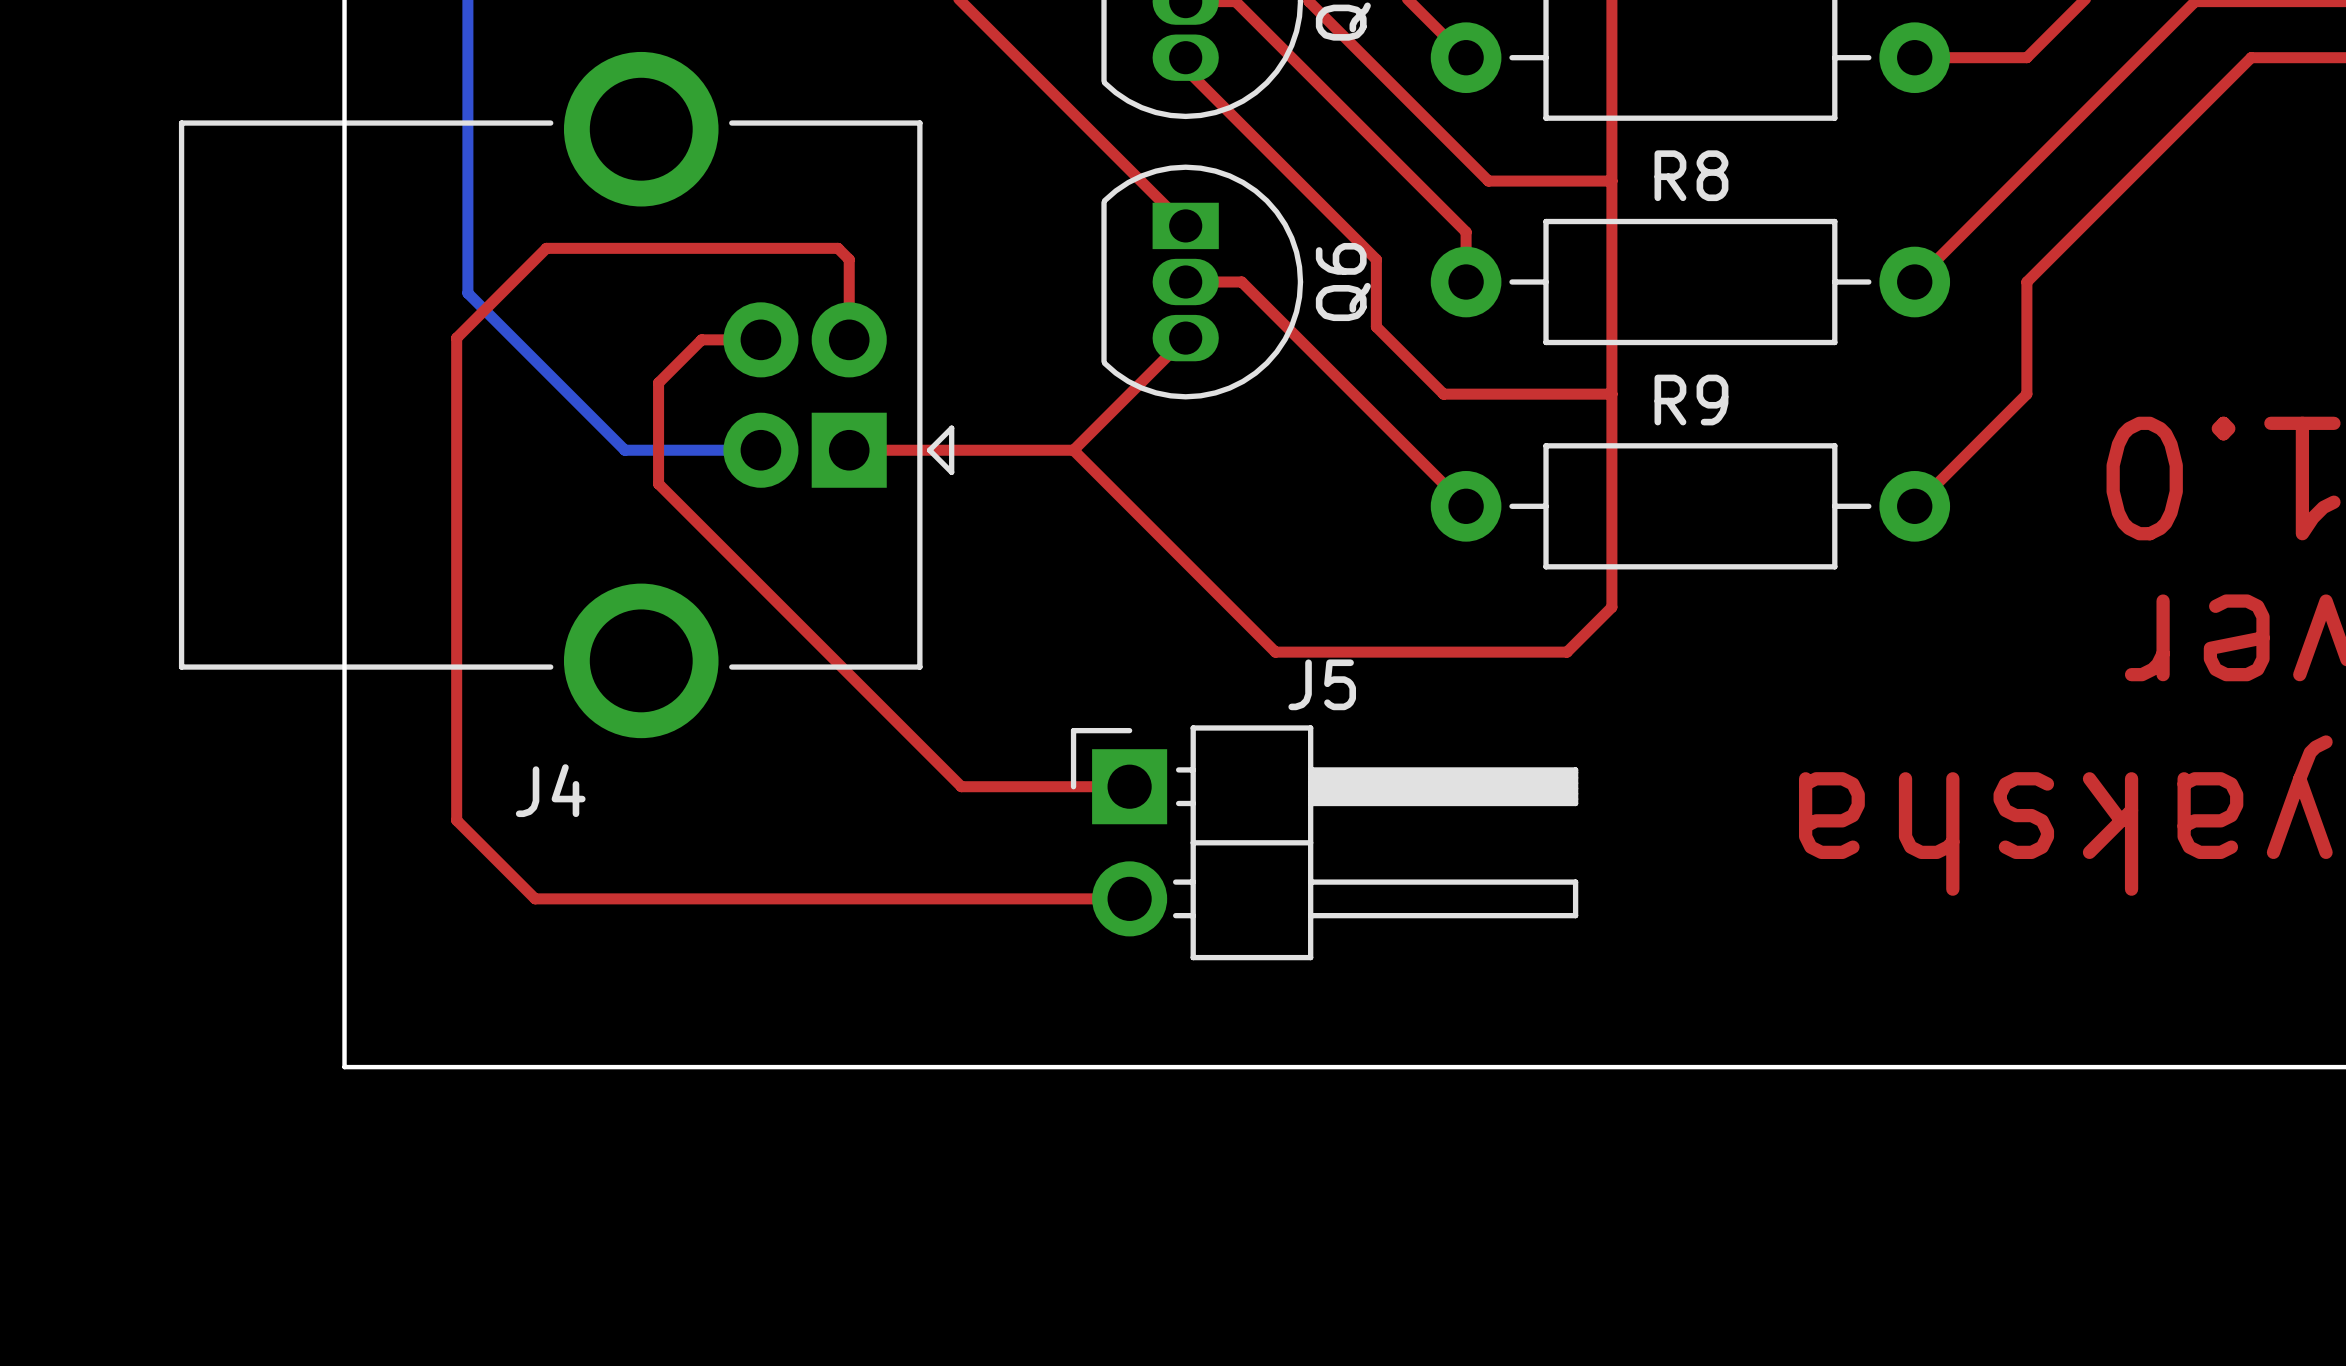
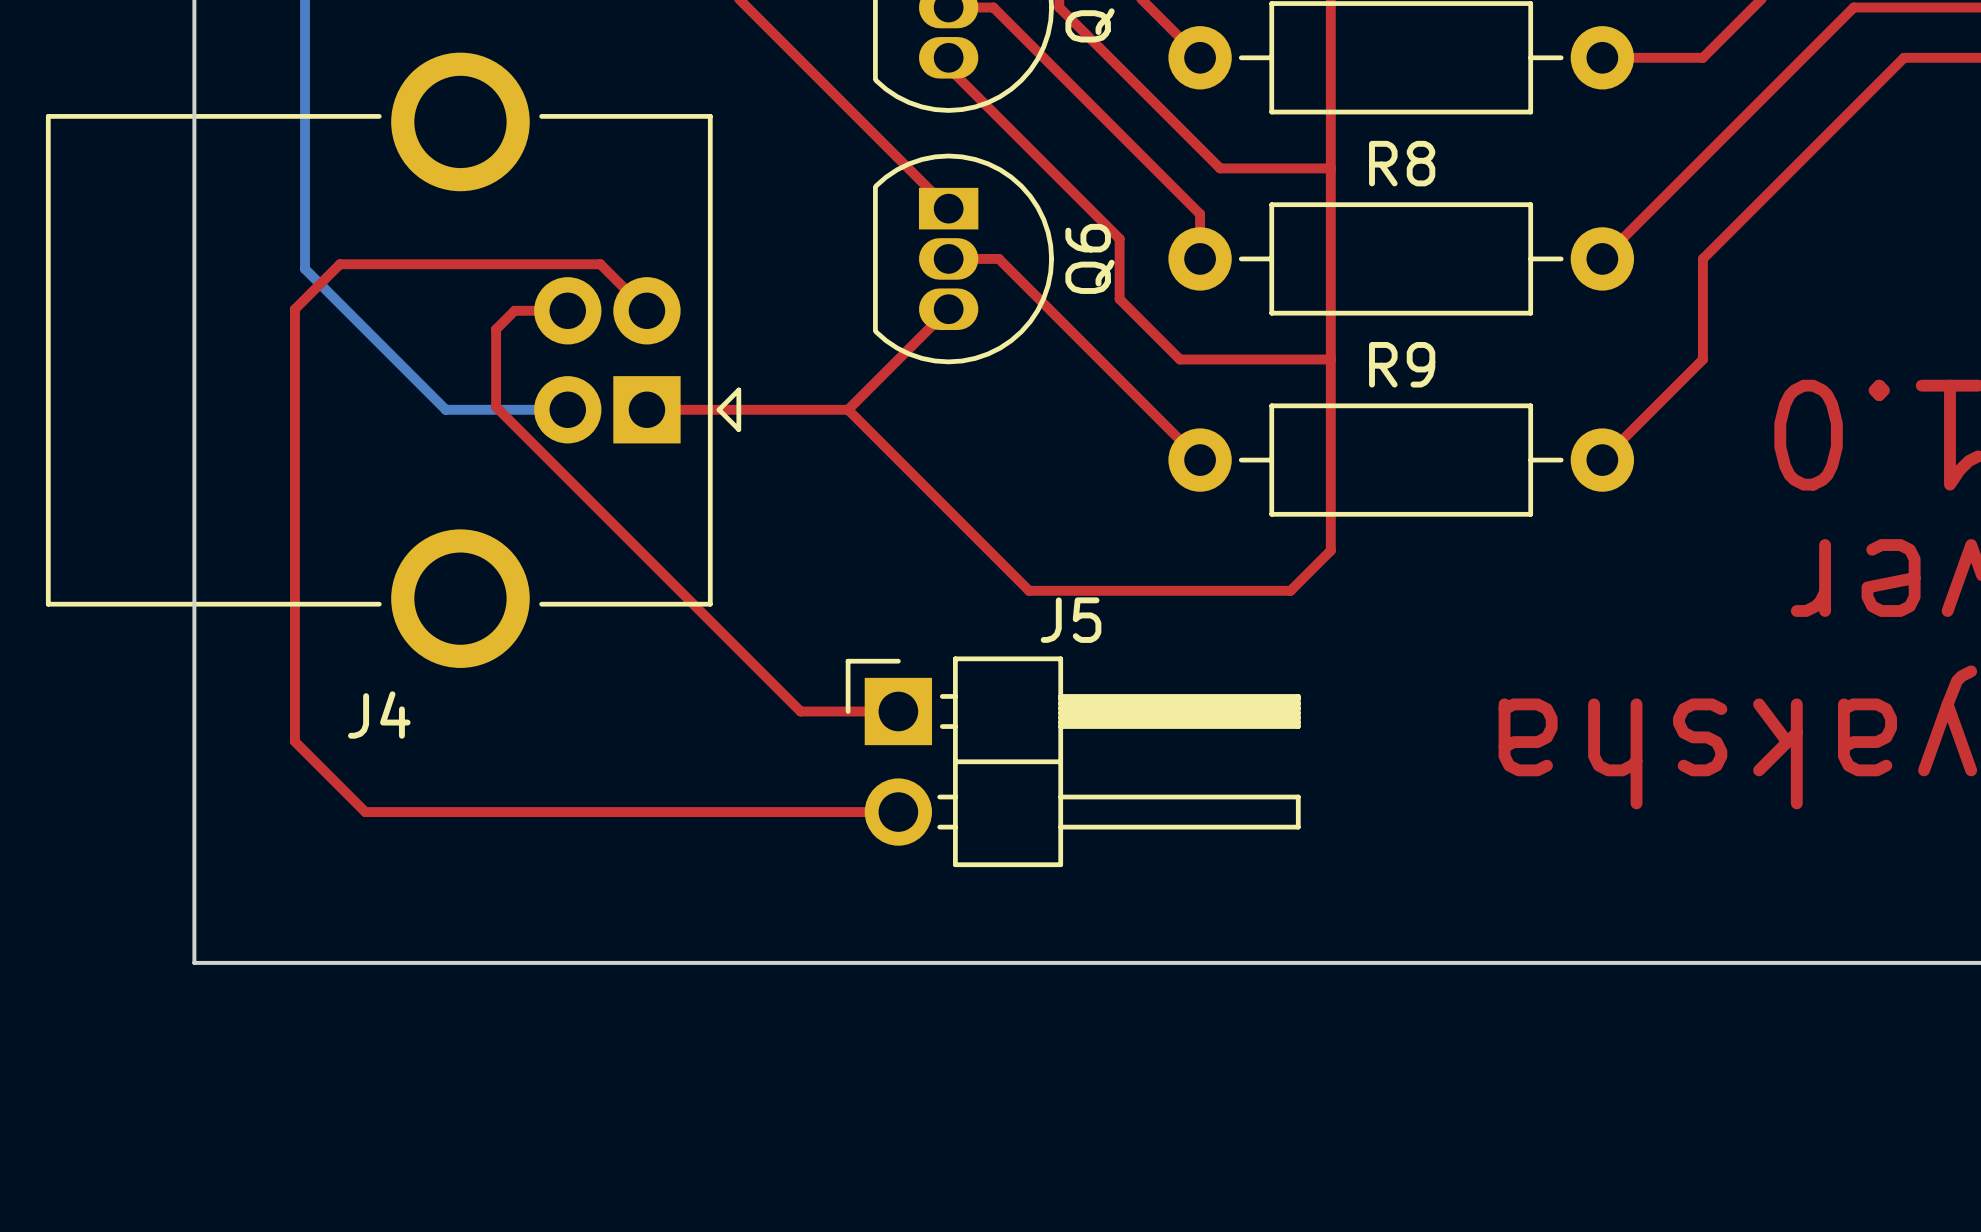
top track: (506, 287) (546, 248) (838, 248) (849, 259) (849, 339) -> (339, 264) (600, 264) (646, 310)
top track: (680, 360) (658, 382) (658, 483) (961, 786) (1020, 786) -> (496, 329) (496, 406) (800, 711)

